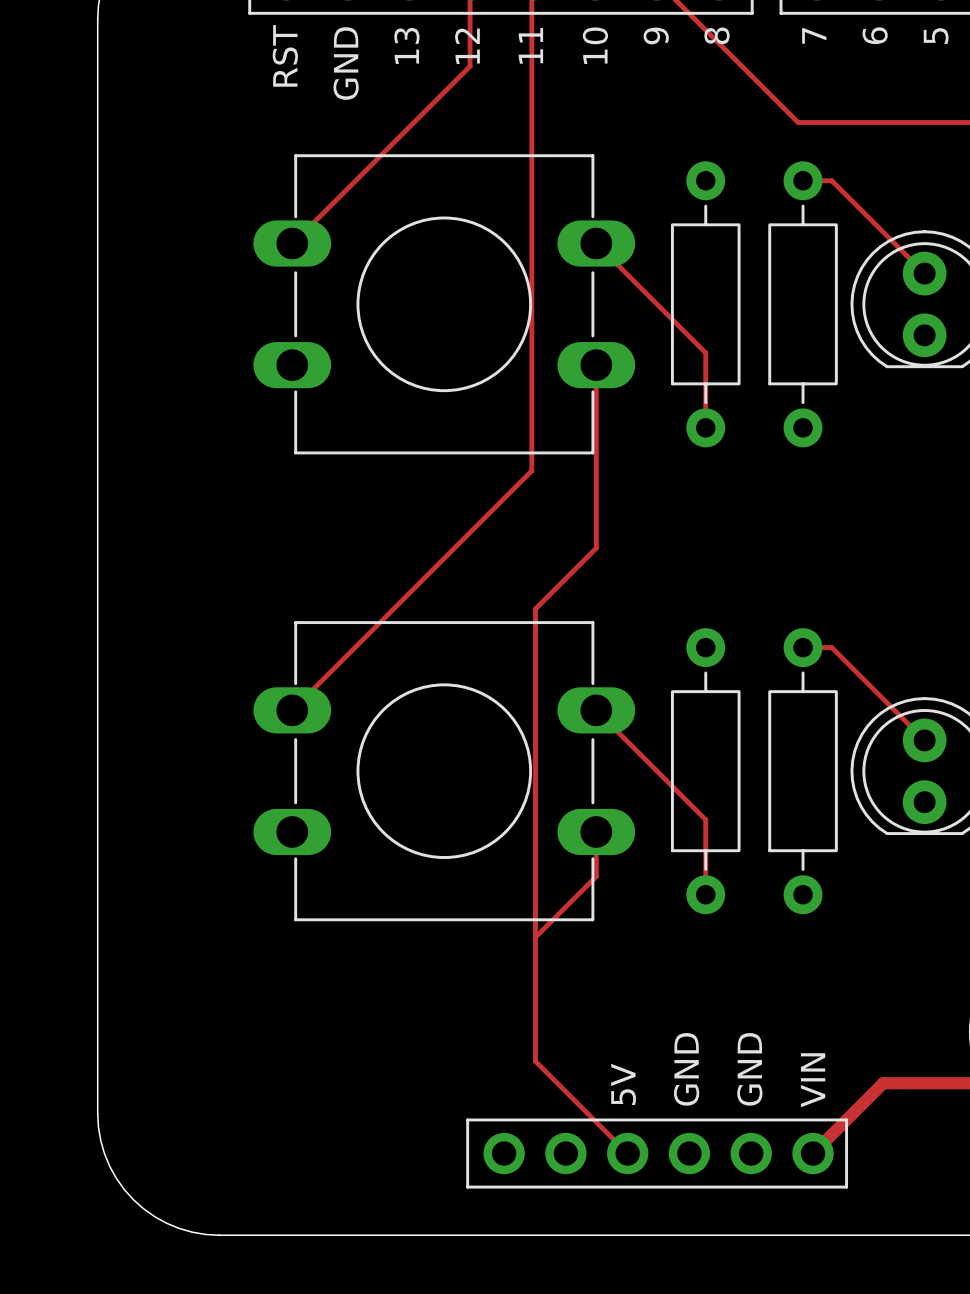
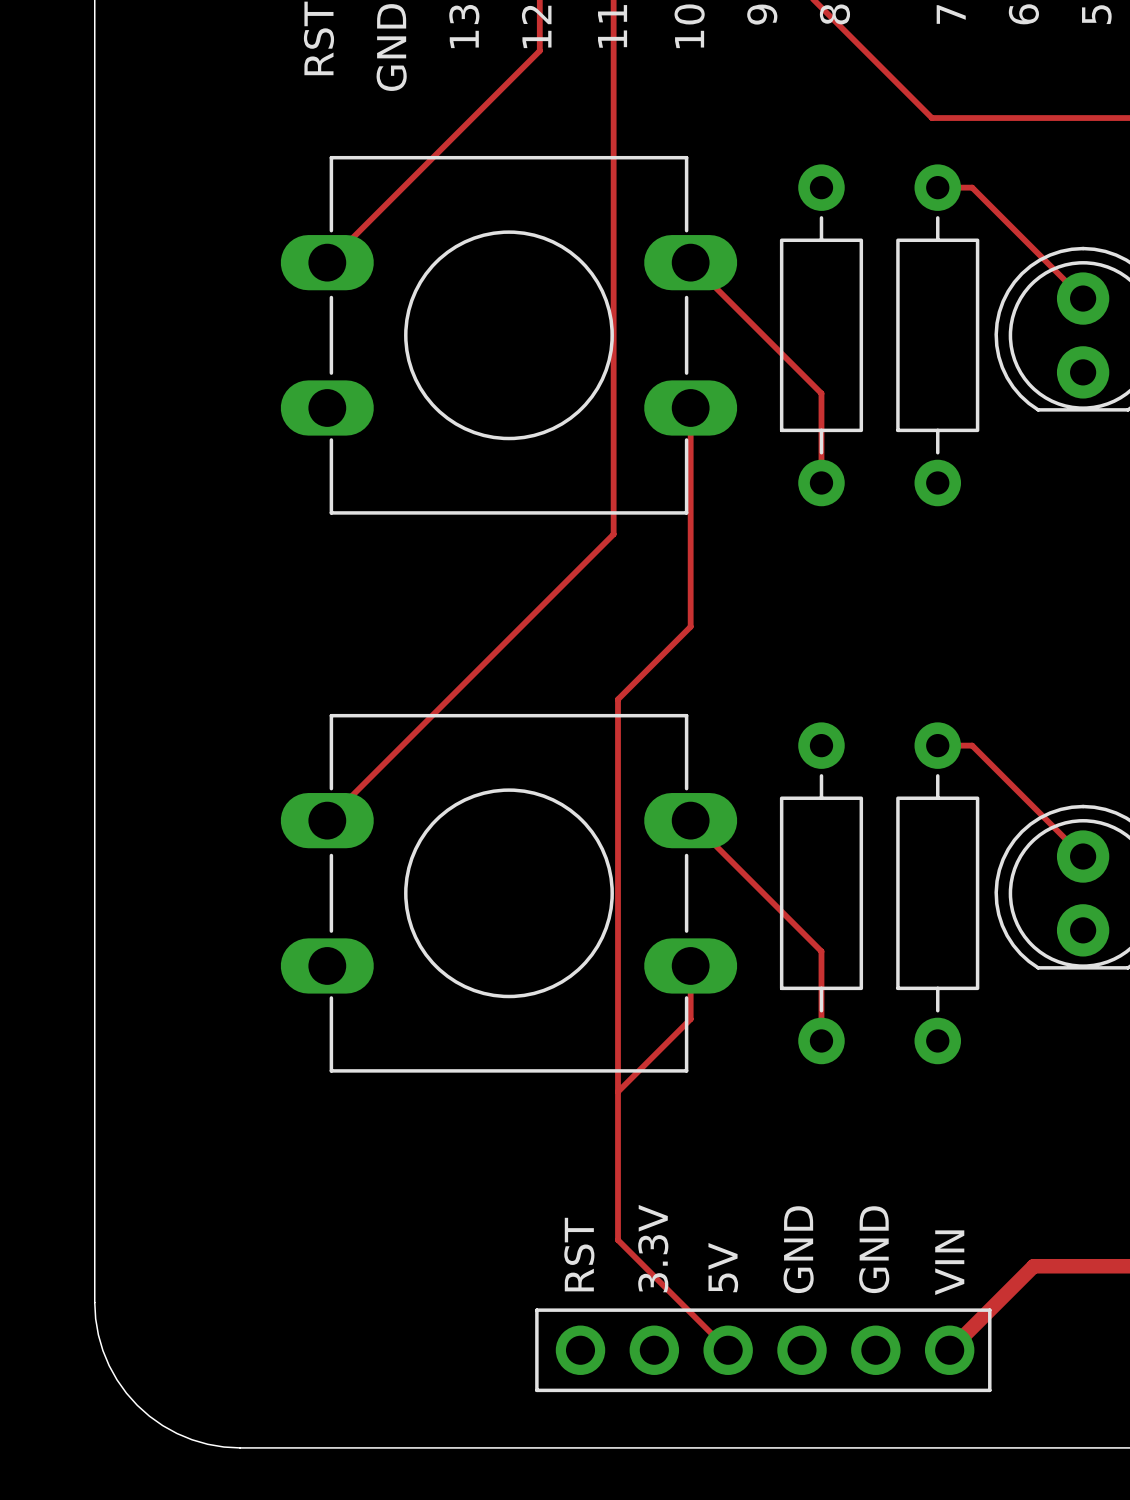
text: none -> 3.3V (653, 1248)
text: none -> RST (579, 1254)

